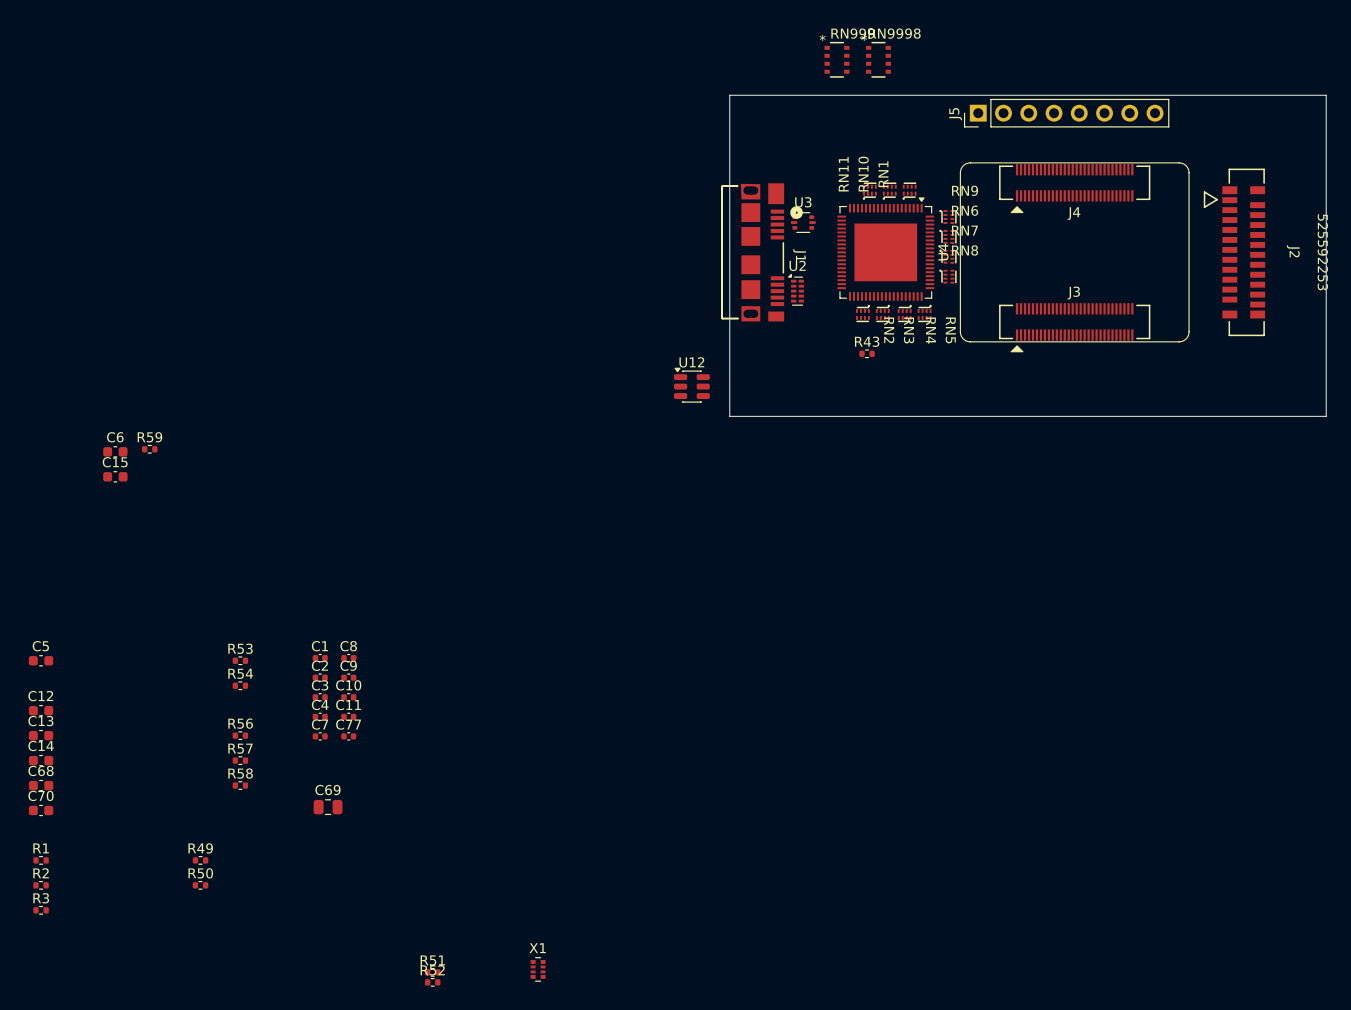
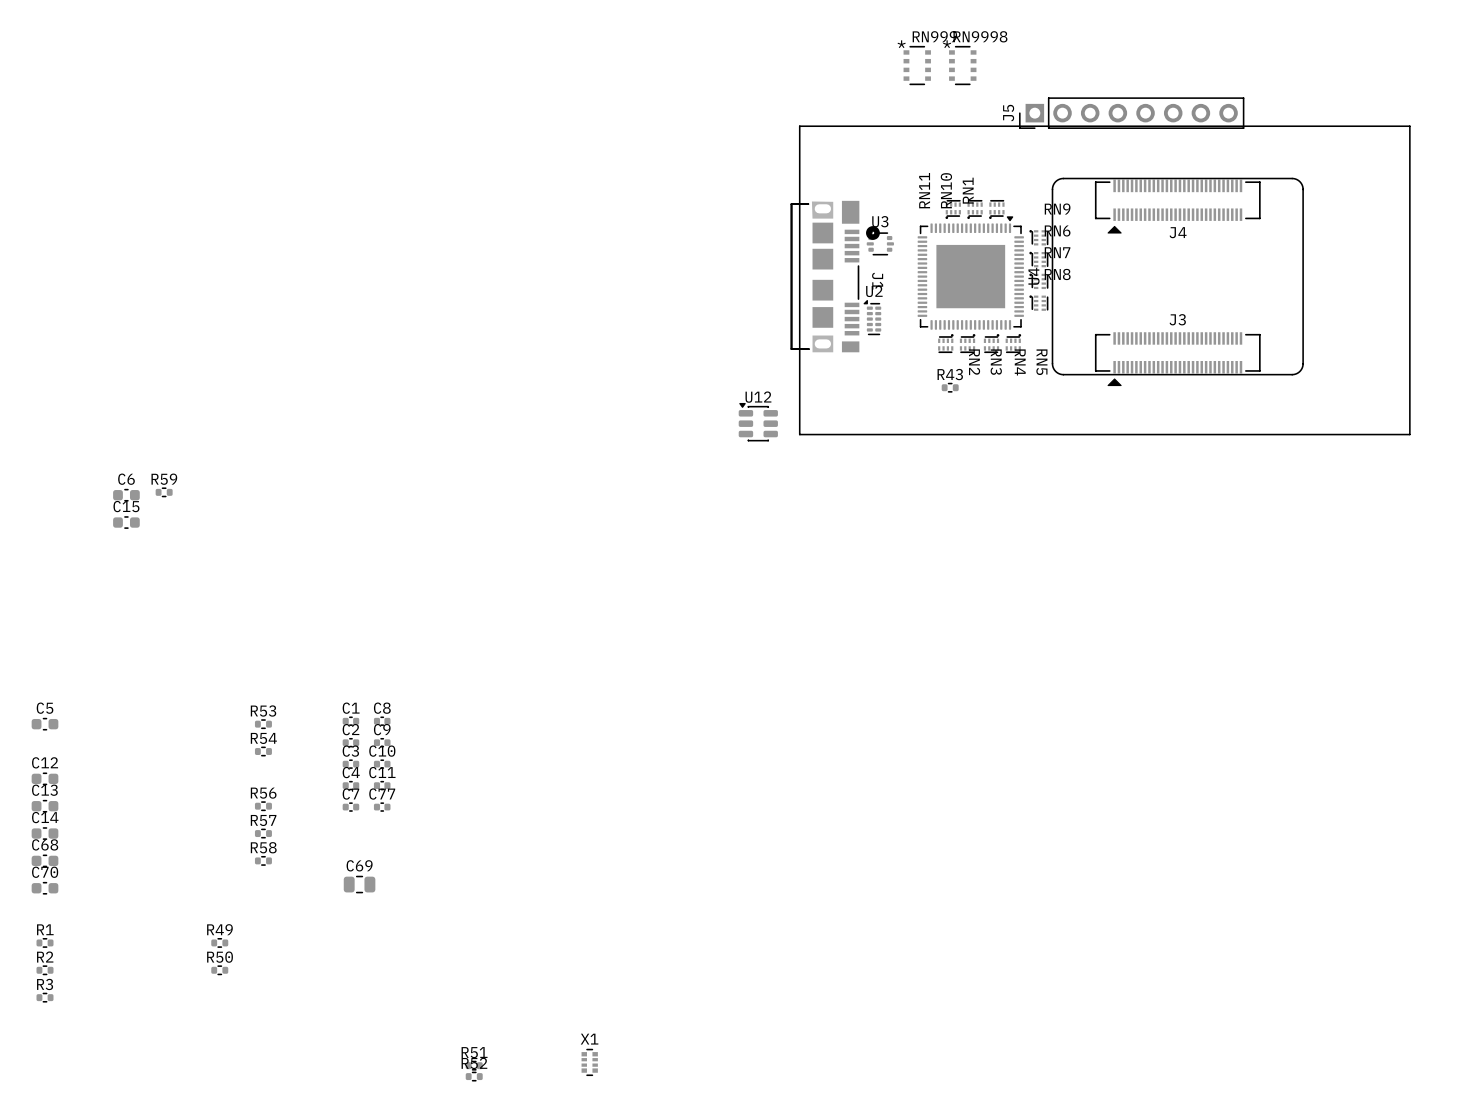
J5 position: (1066, 113) -> (1131, 113)
board edge: (729, 115) (729, 95) (1326, 95) (1326, 416) (729, 416) (729, 396) -> (799, 126) (1409, 126) (1409, 434) (799, 434)
J2: (1234, 252) -> none

